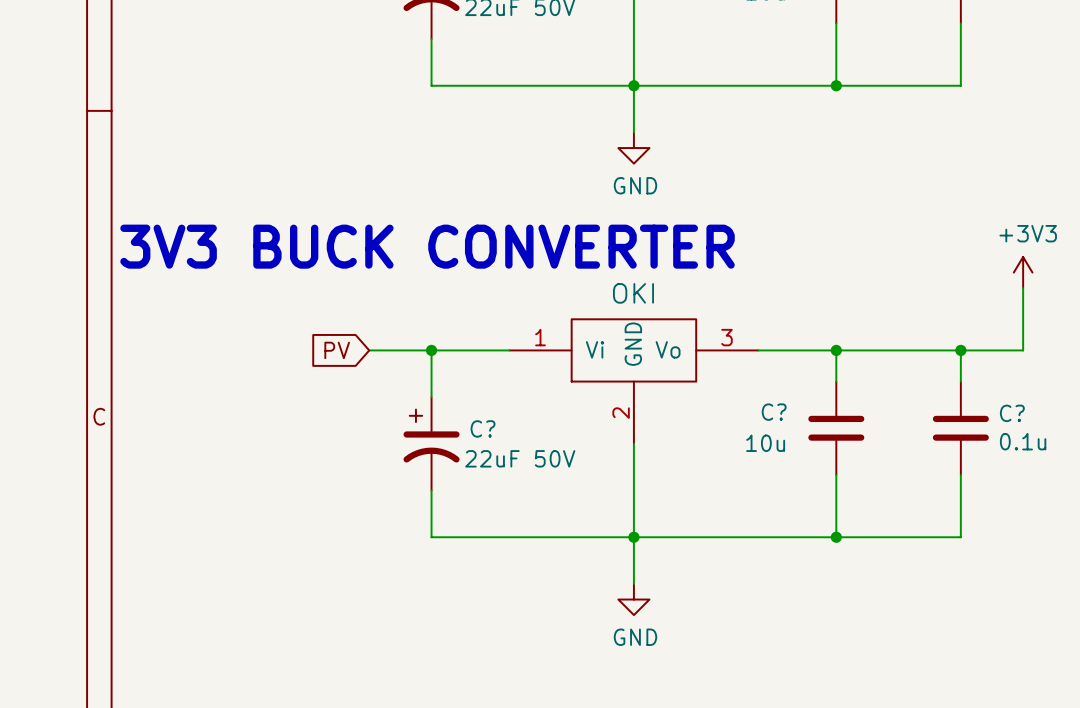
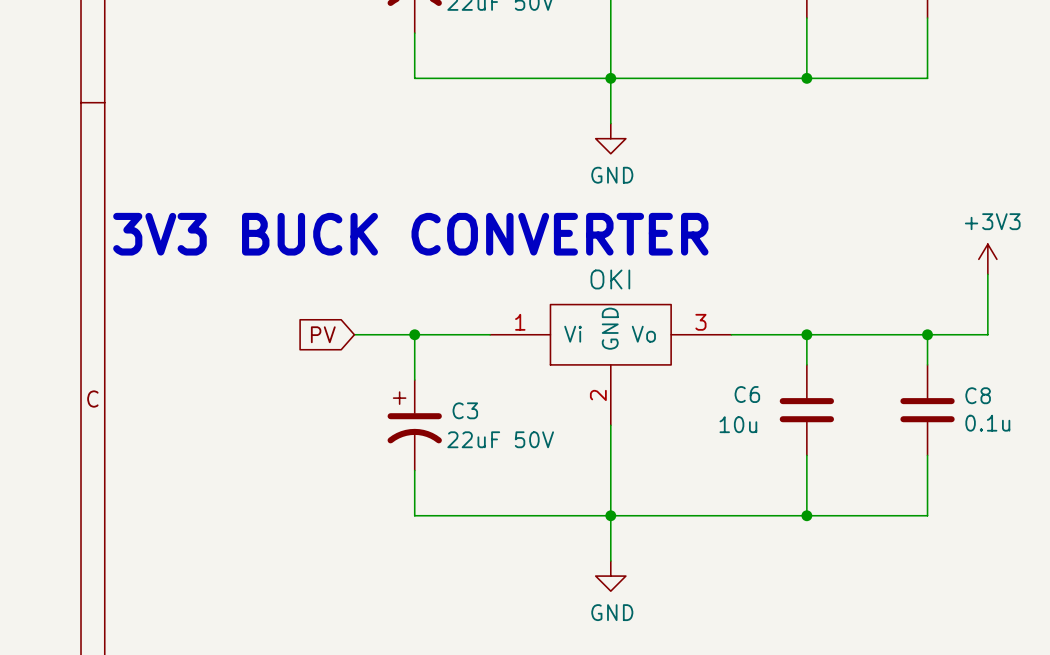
C? name: C? (774, 412) -> C6 (747, 394)
C? name: C? (1012, 413) -> C8 (978, 395)
C? name: C? (483, 428) -> C3 (465, 410)

